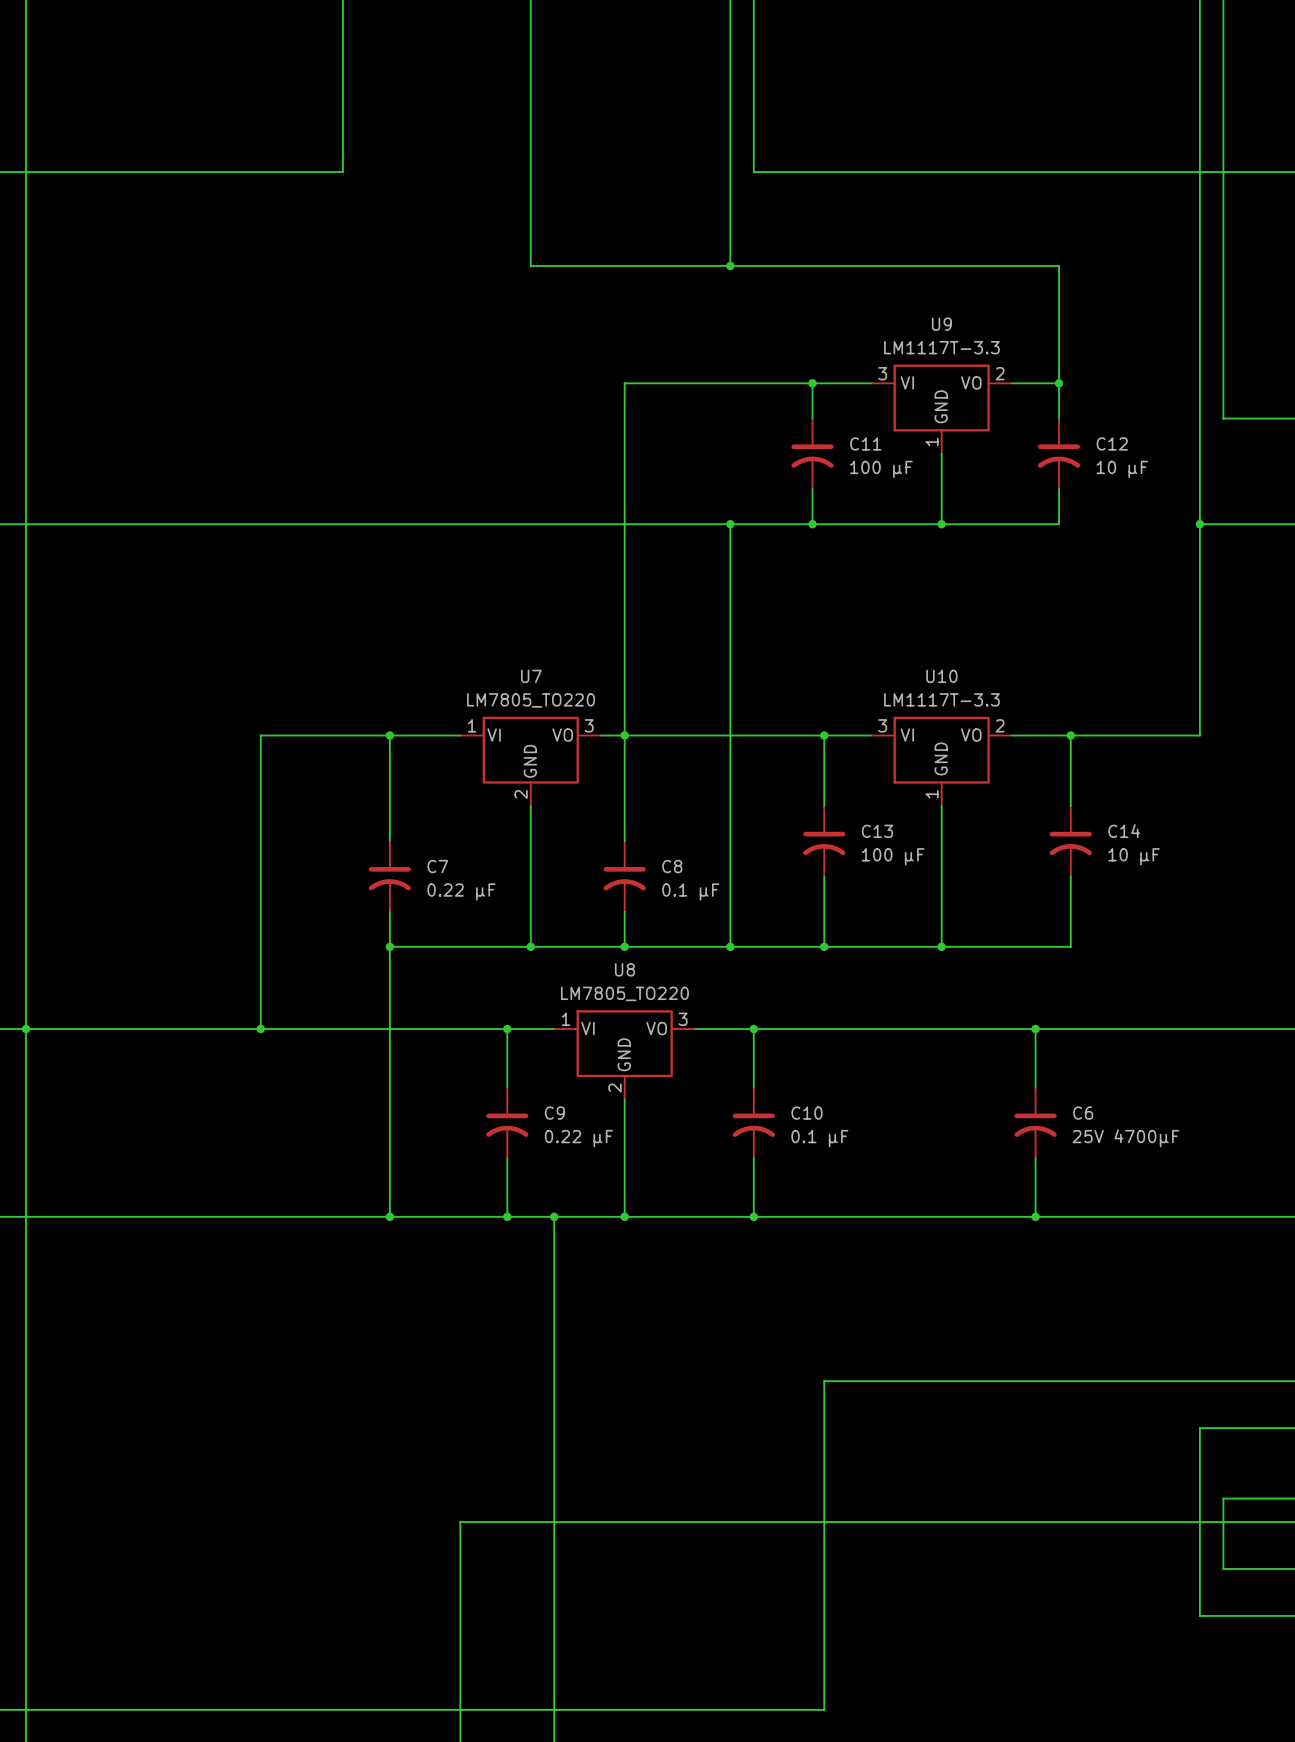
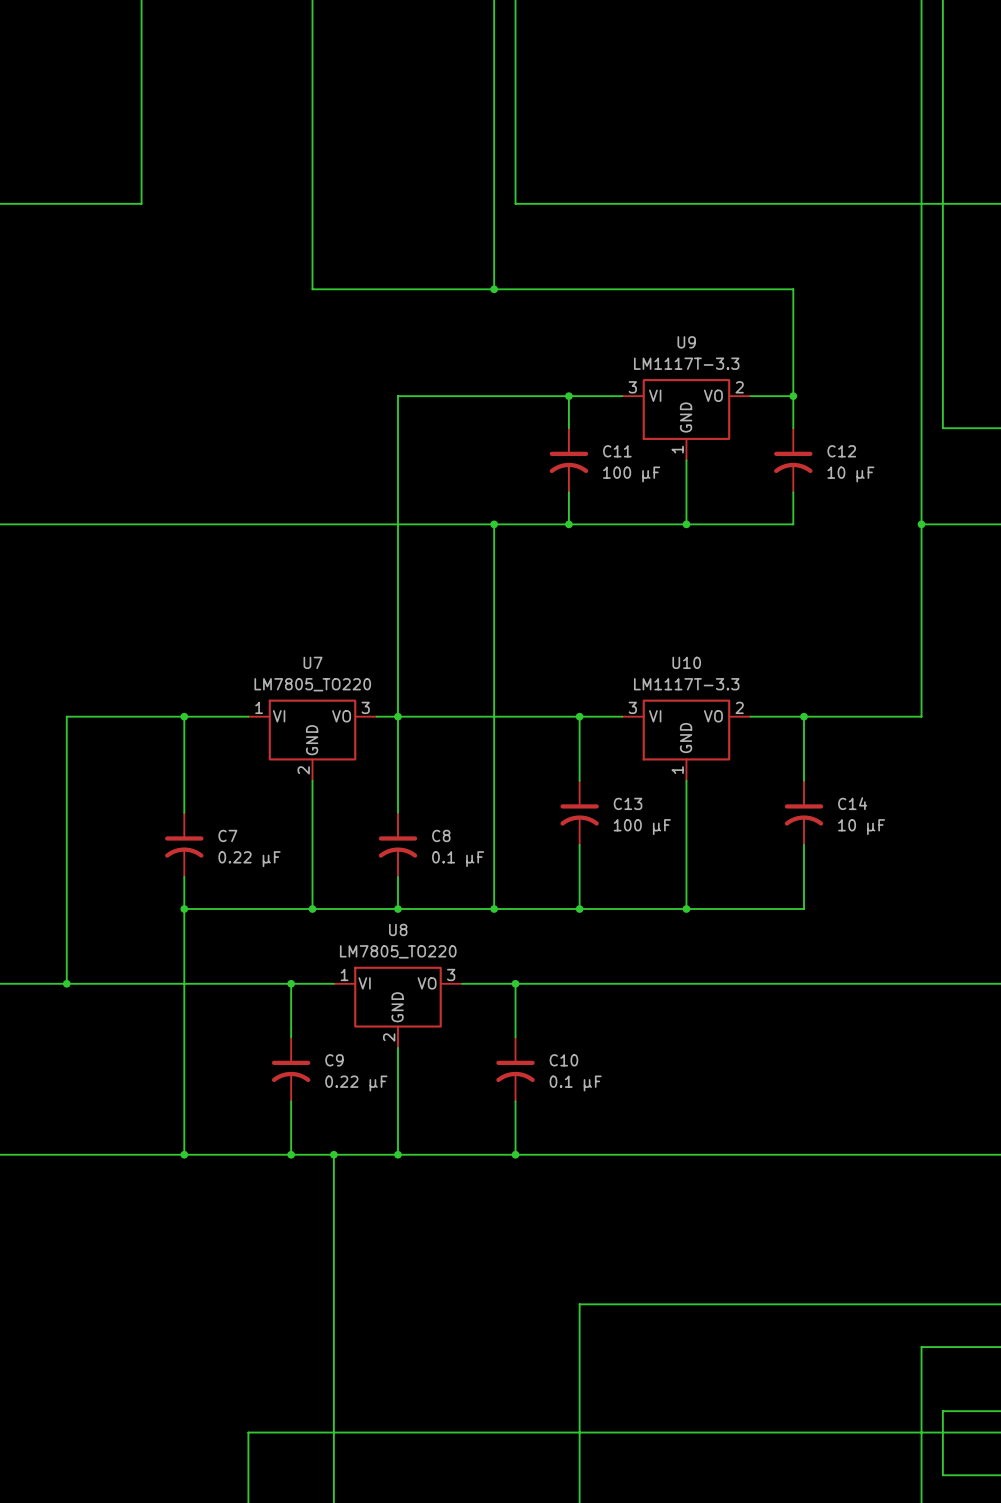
wire: (1035, 1029) (1035, 1087) -> none
junction: (1035, 1029) -> none
C6: 25V 4700μF (1035, 1122) -> none
wire: (1035, 1158) (1035, 1216) -> none
junction: (1035, 1216) -> none

